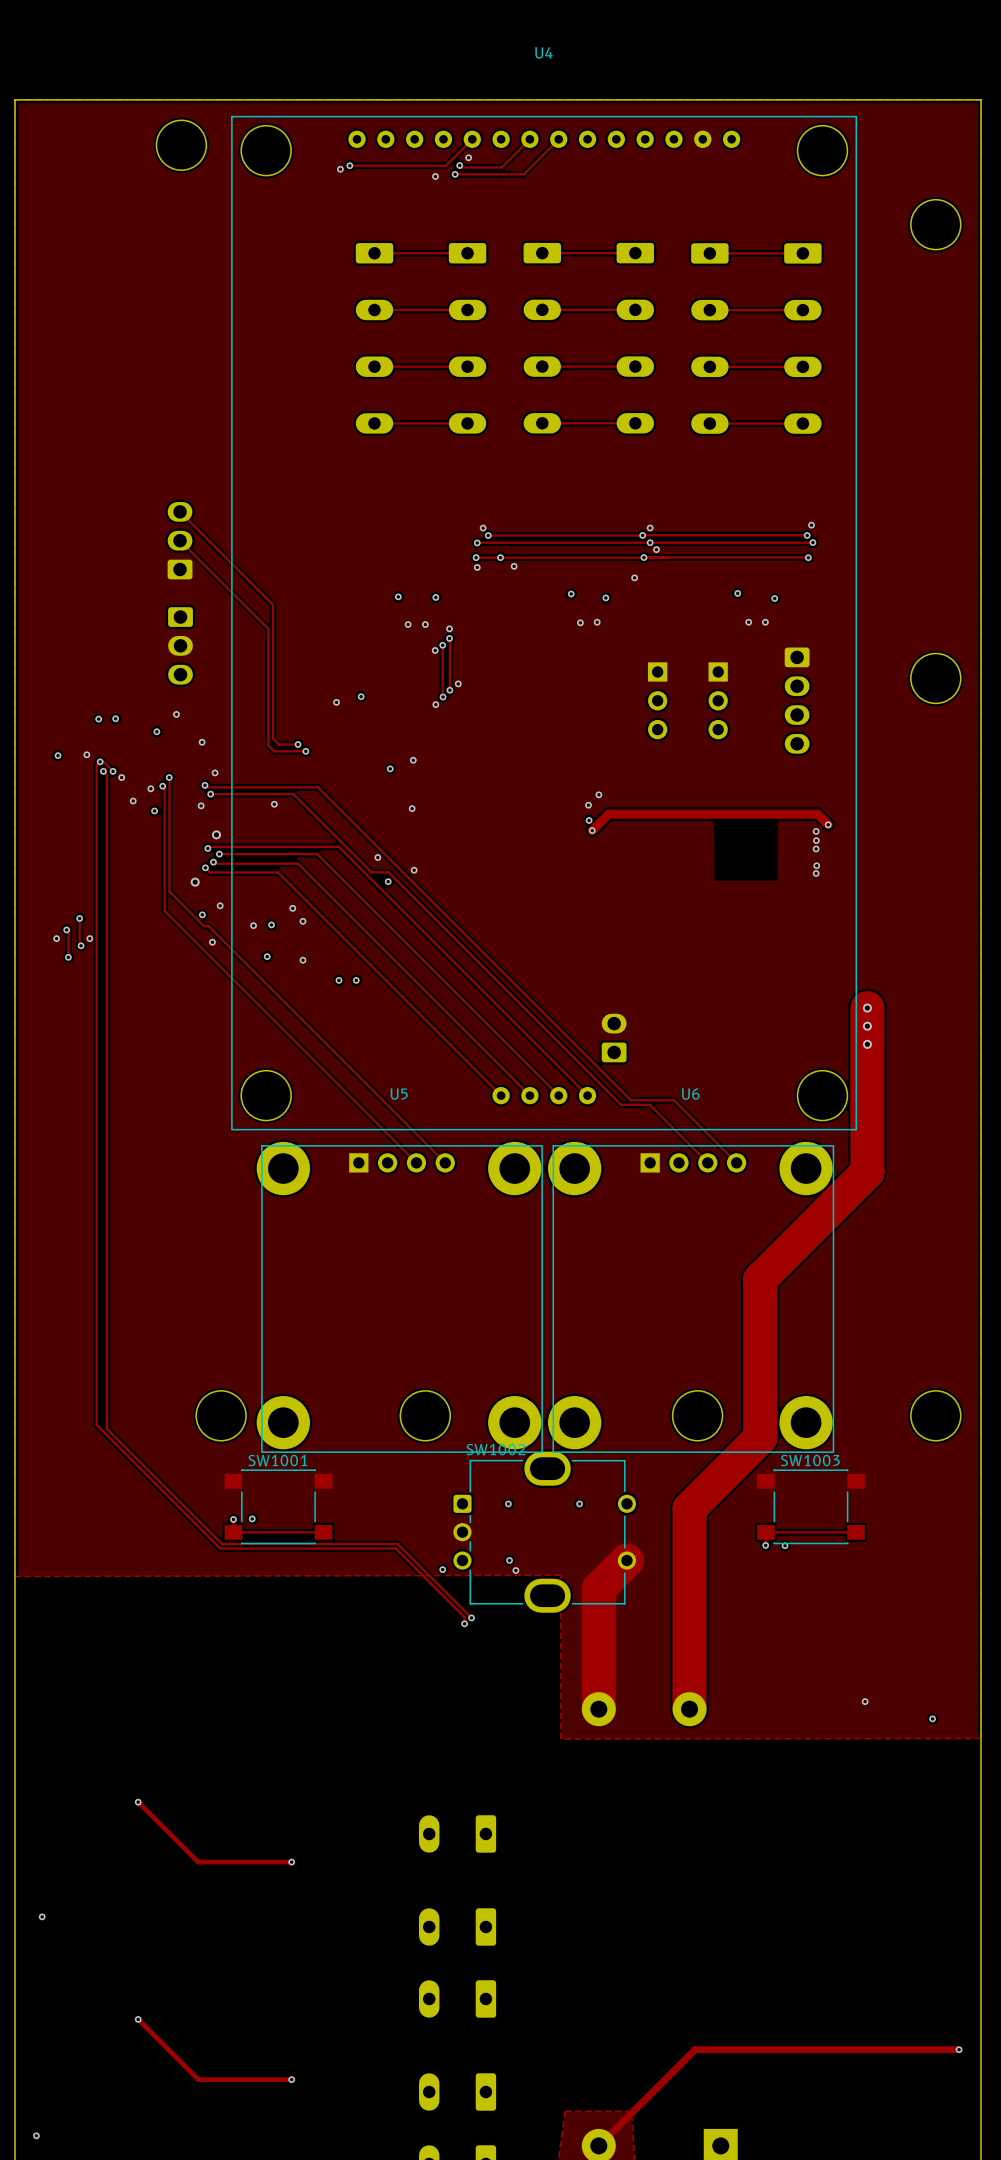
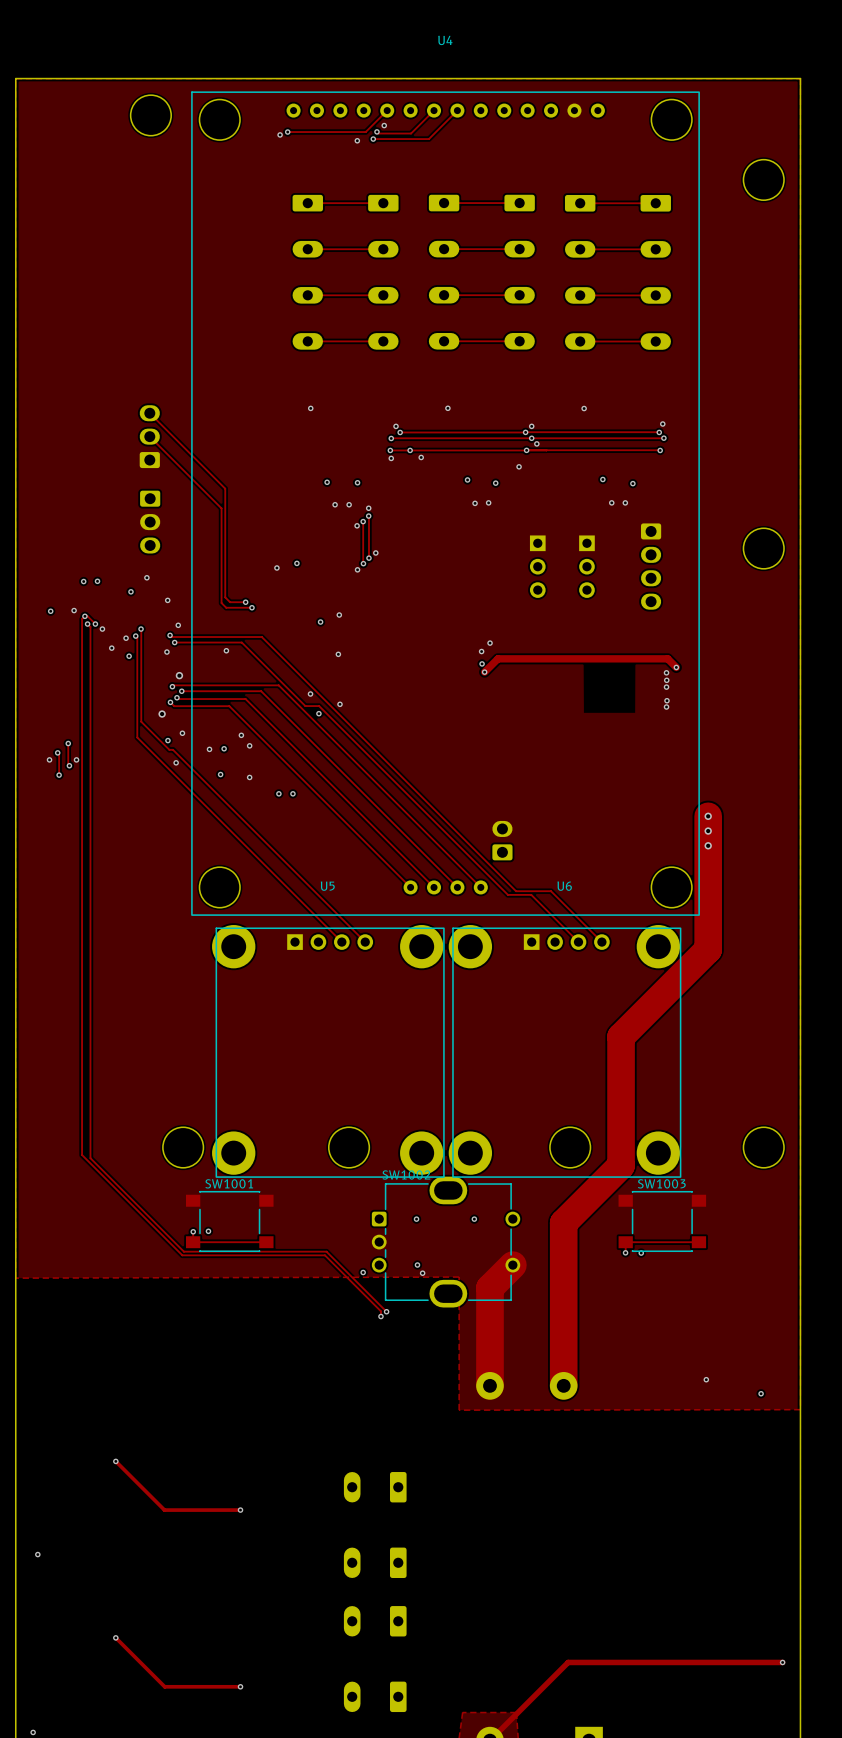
via: none -> (310, 408)
via: none -> (447, 408)
via: none -> (584, 408)

